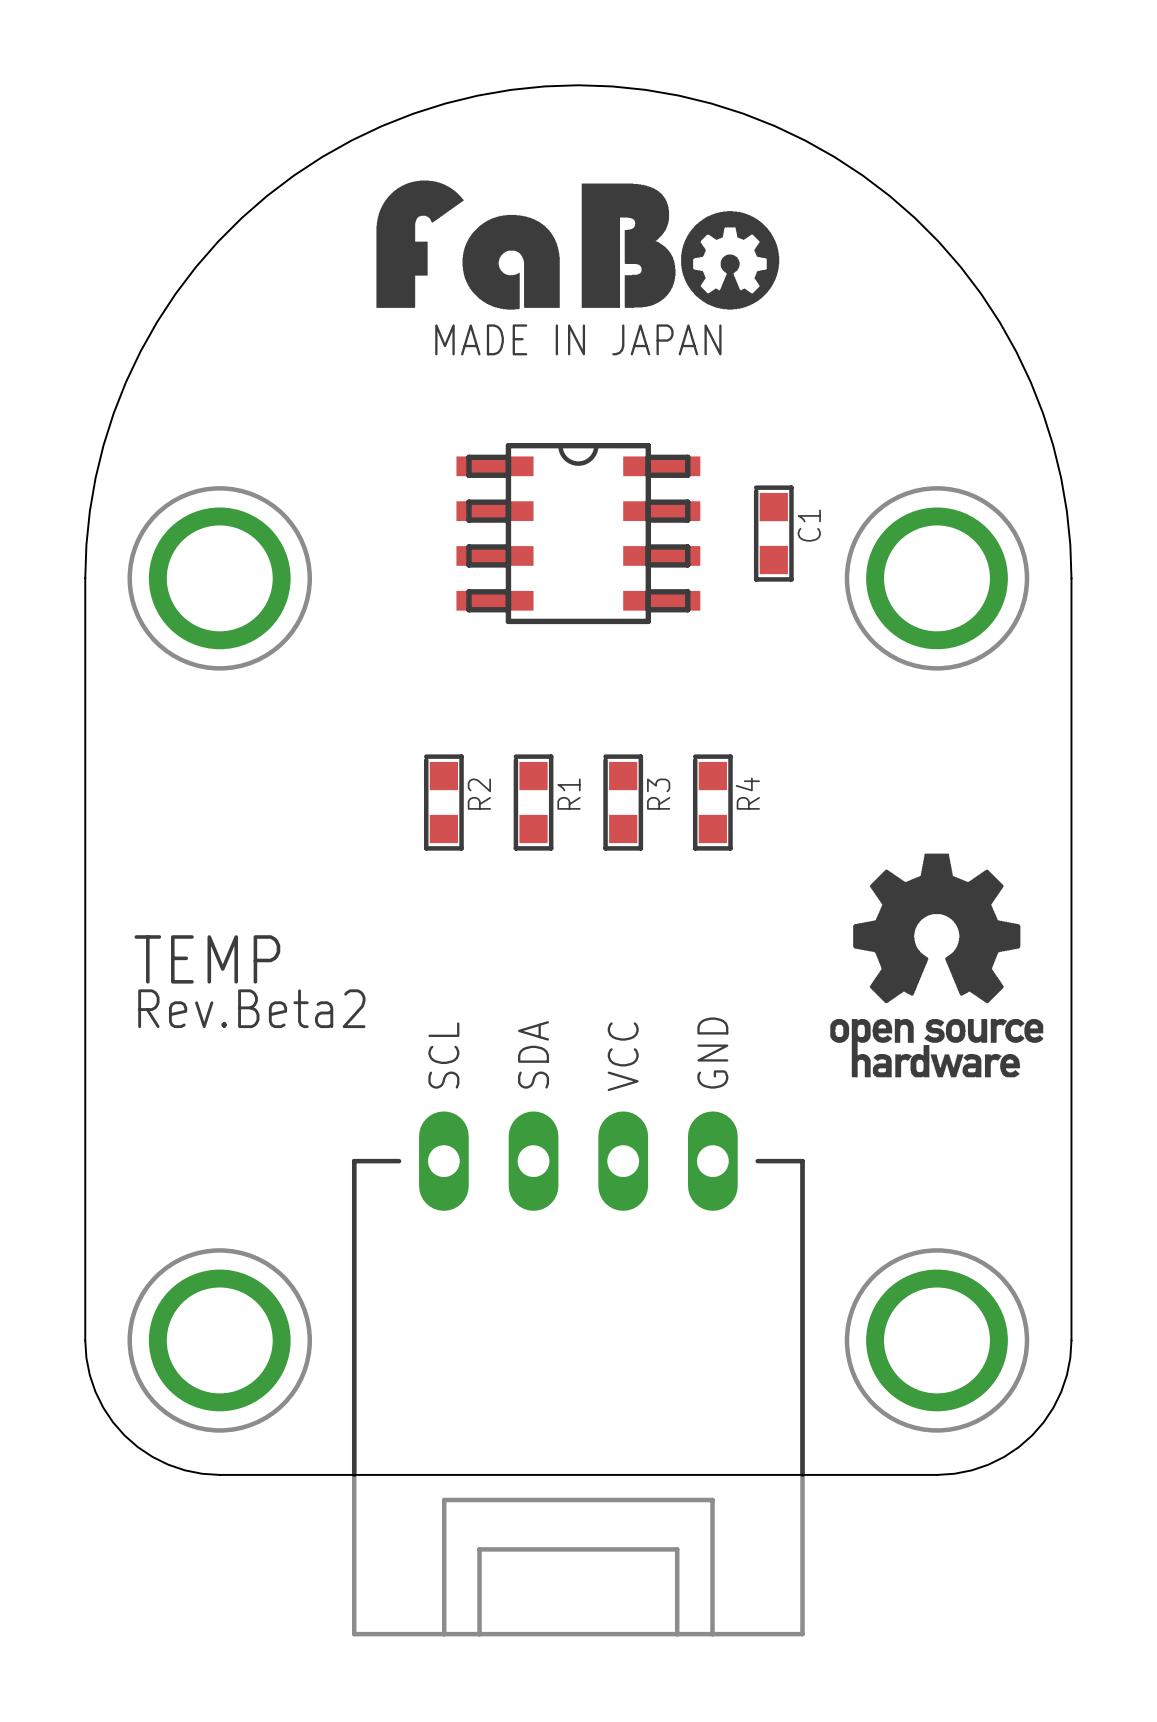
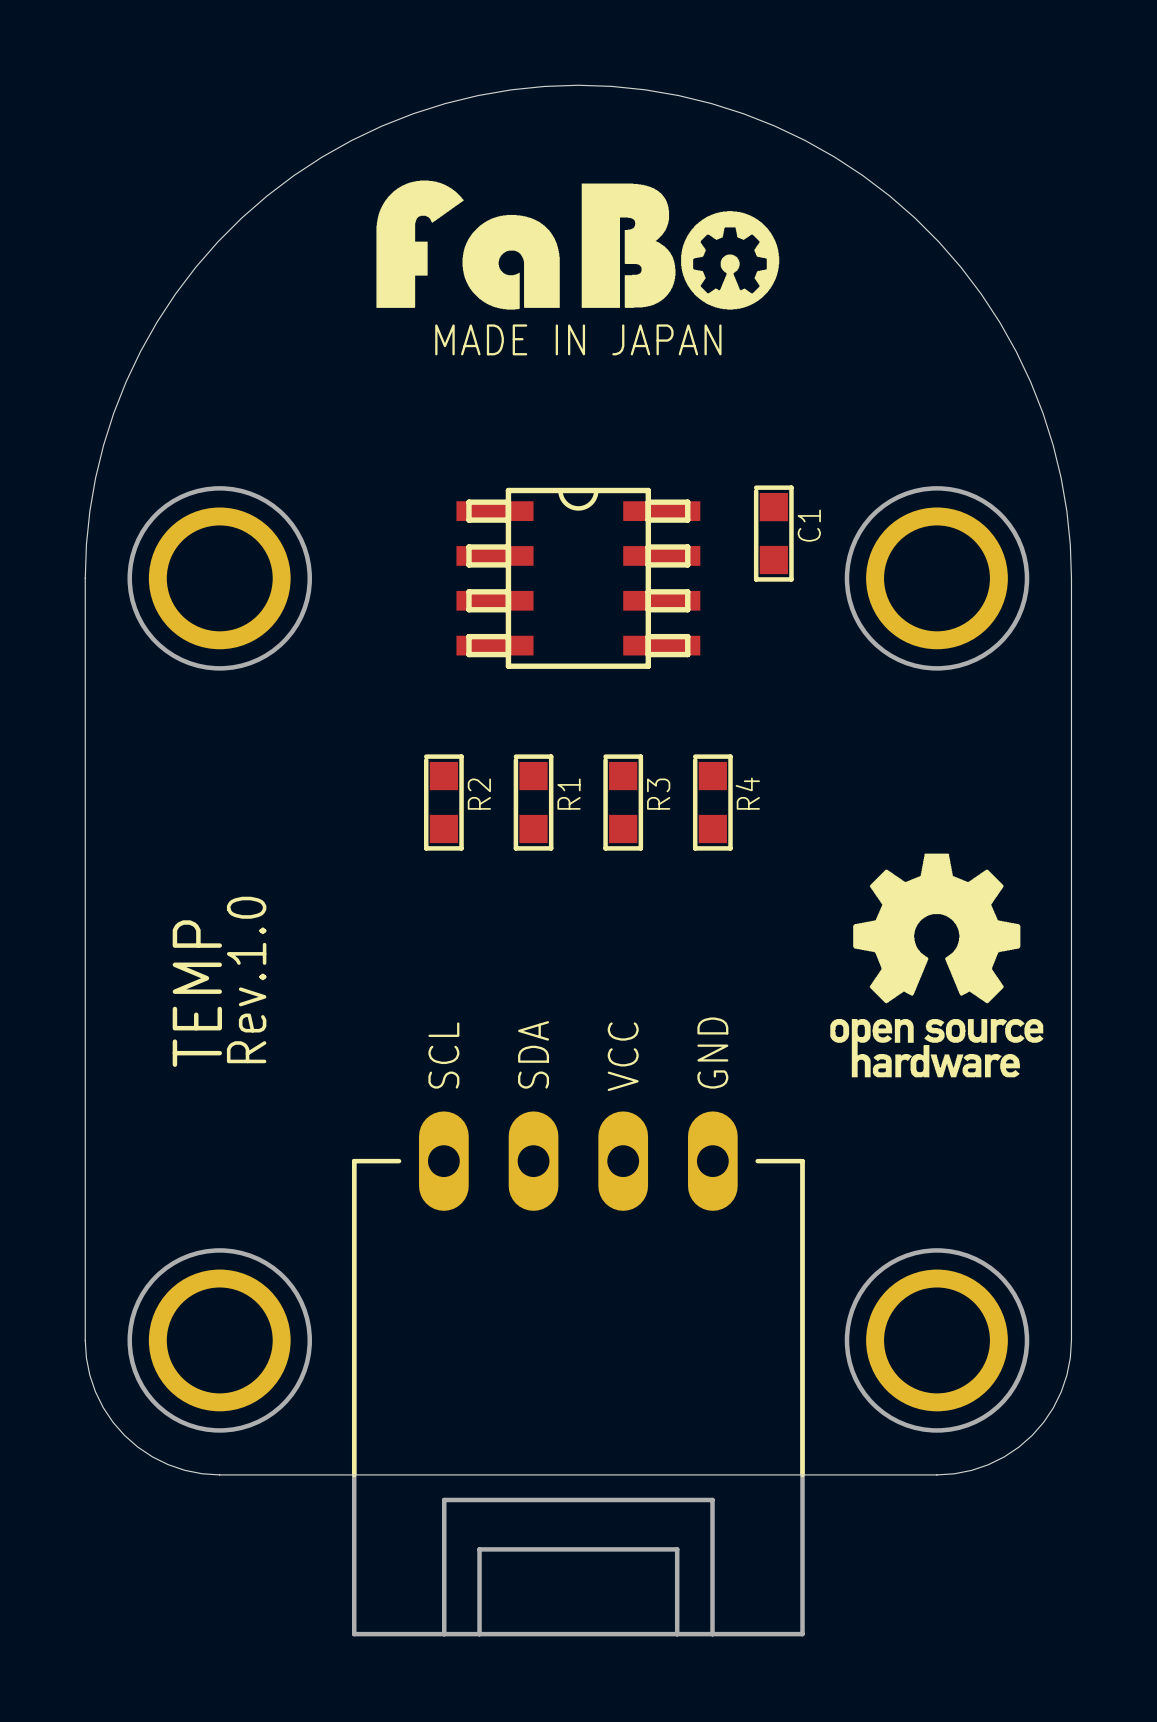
part position: (578, 533) -> (578, 578)
text rotation: 0° (207, 959) -> 90° counterclockwise (197, 993)
text: none -> Rev.1.0 (246, 979)
text: Rev.Beta2 (251, 1008) -> none

